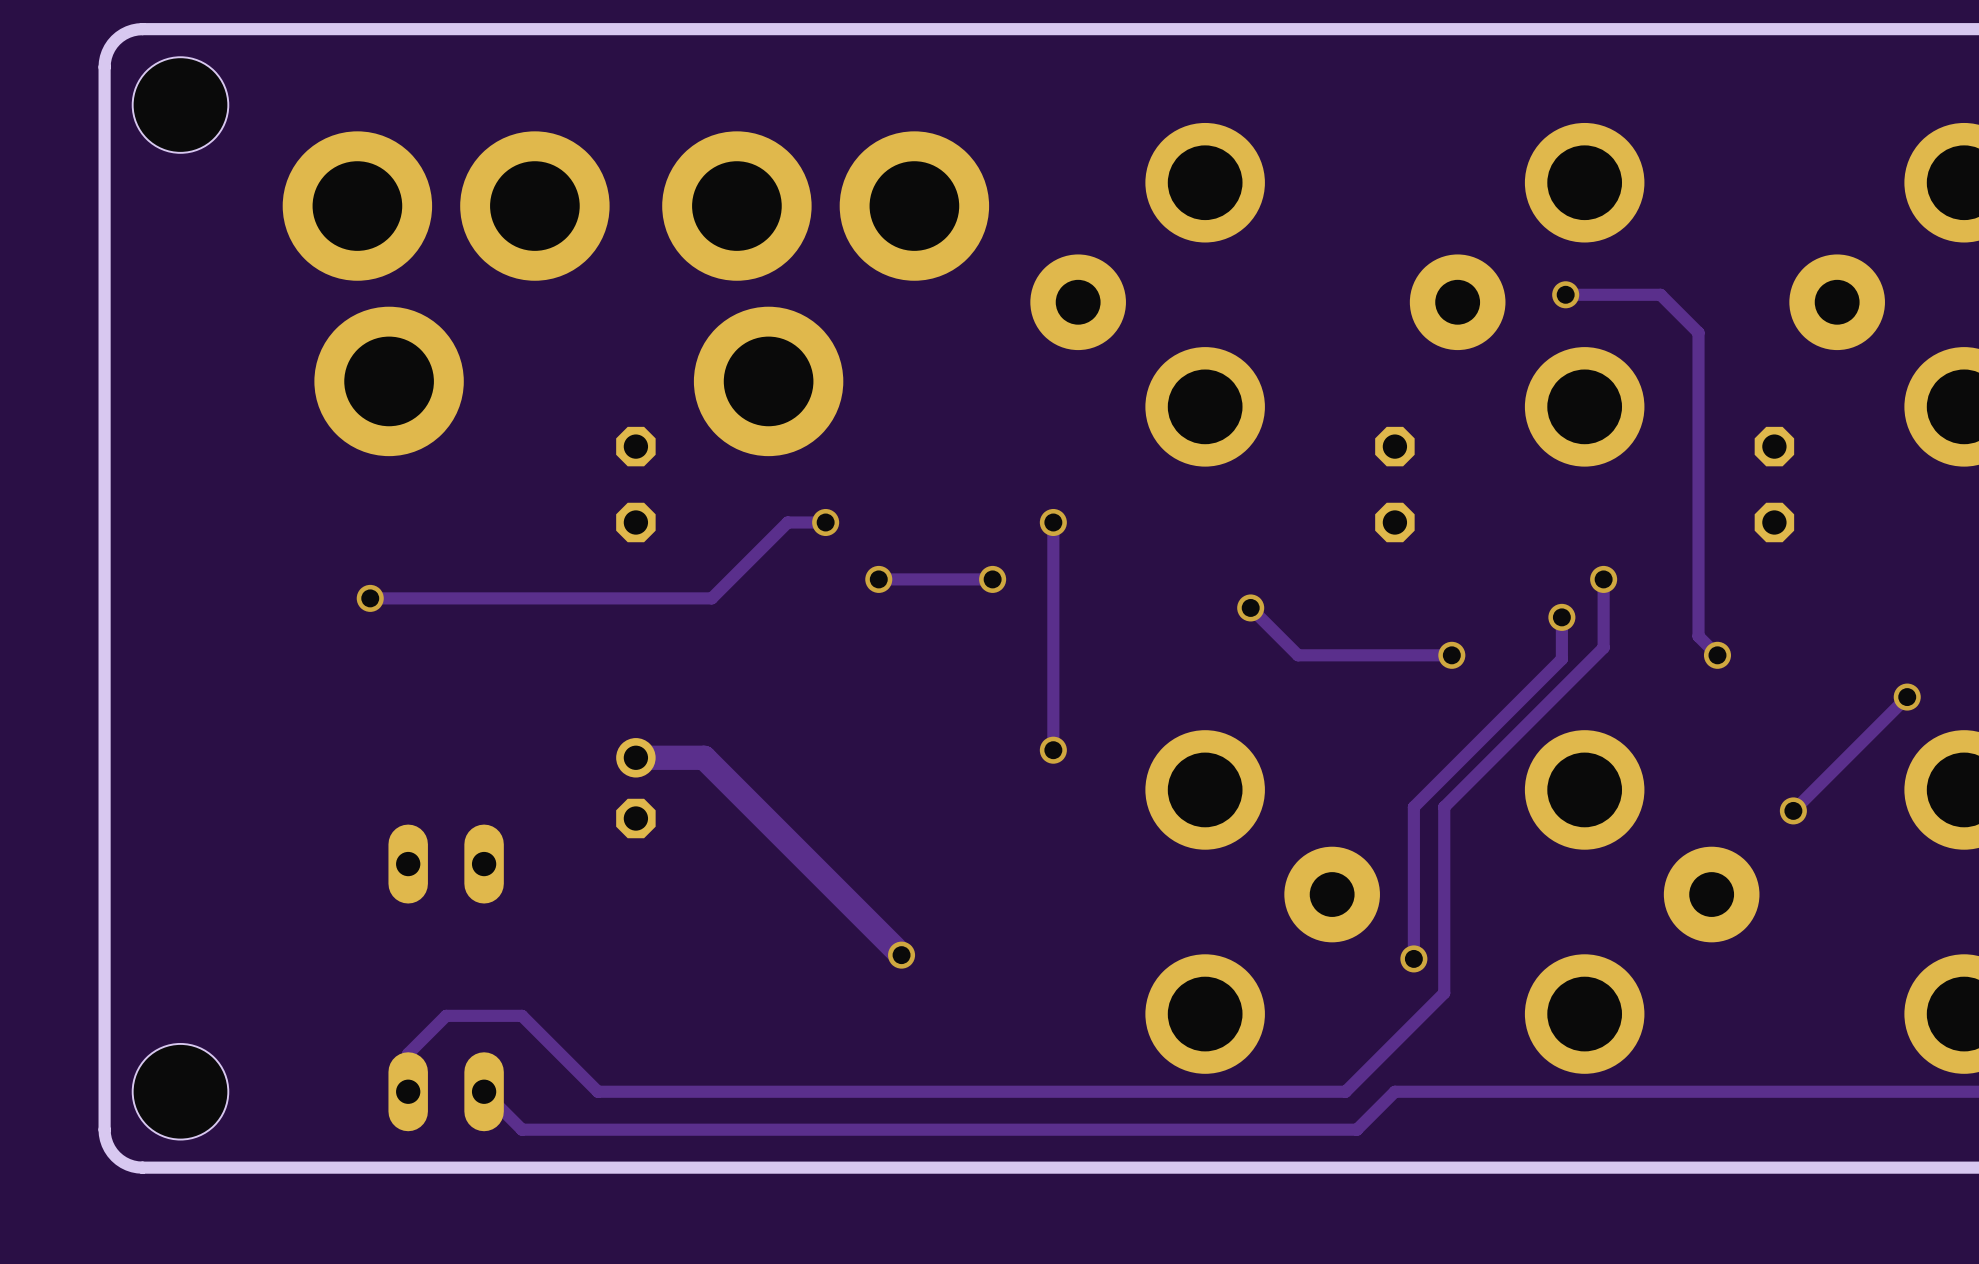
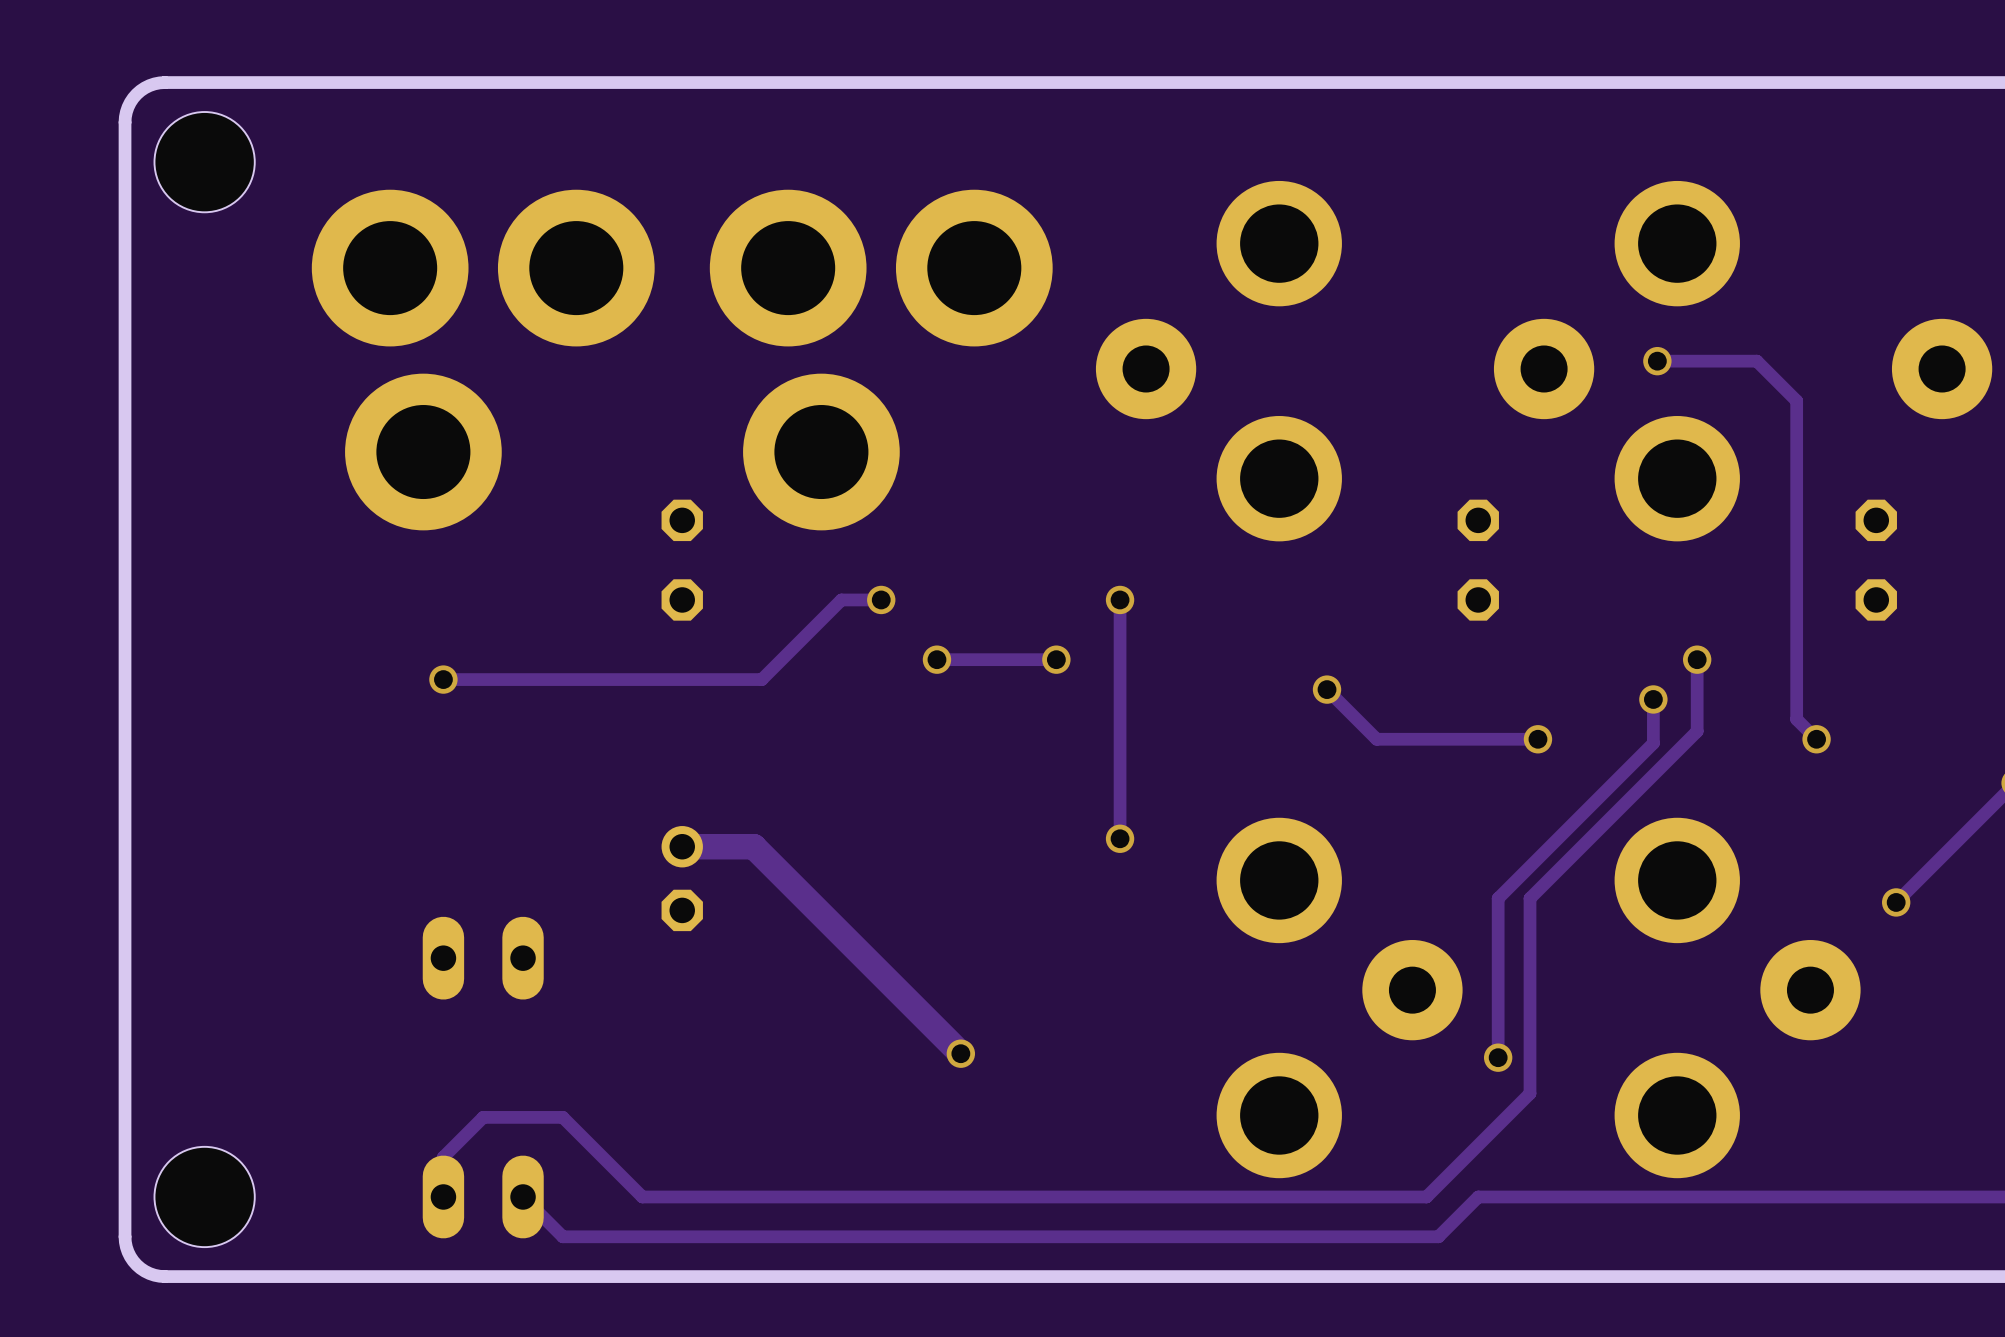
via position: (370, 598) -> (443, 679)
track: (408, 598) (370, 598) -> none

